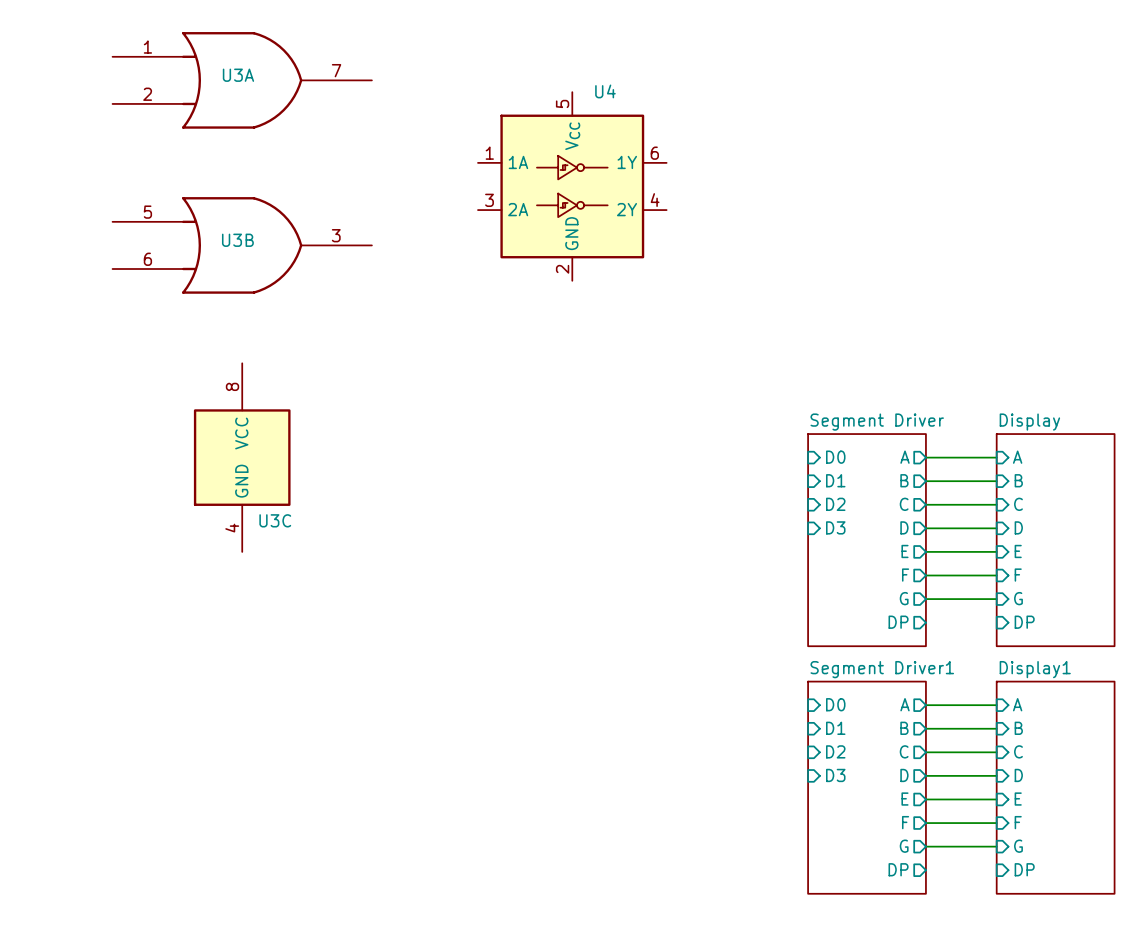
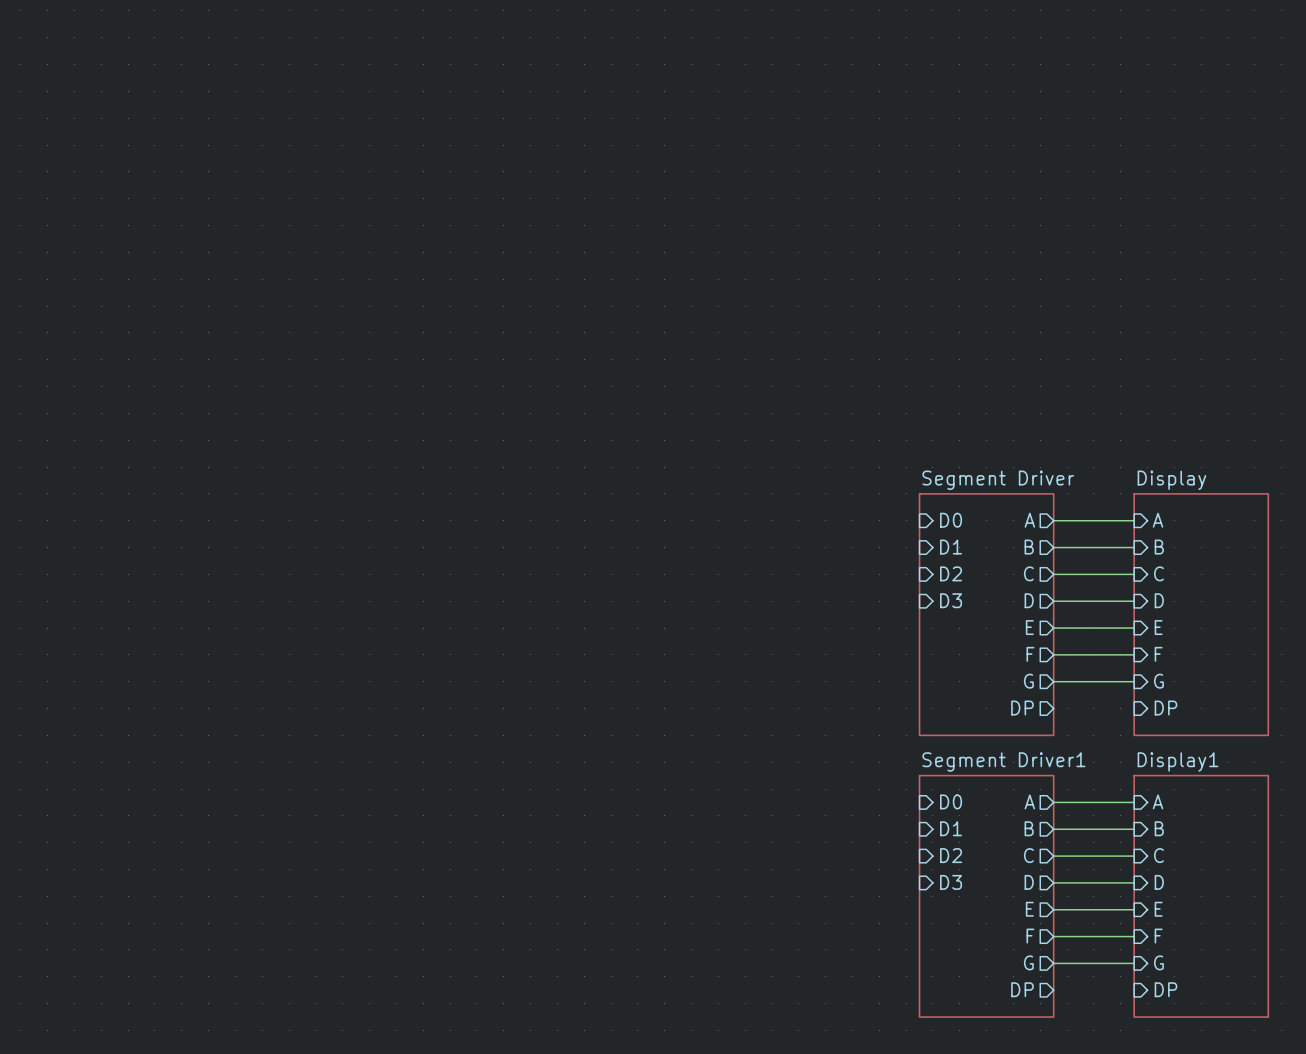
U3A: (242, 80) -> none
U4: (572, 186) -> none
U3B: (242, 245) -> none
U3C: (242, 457) -> none

